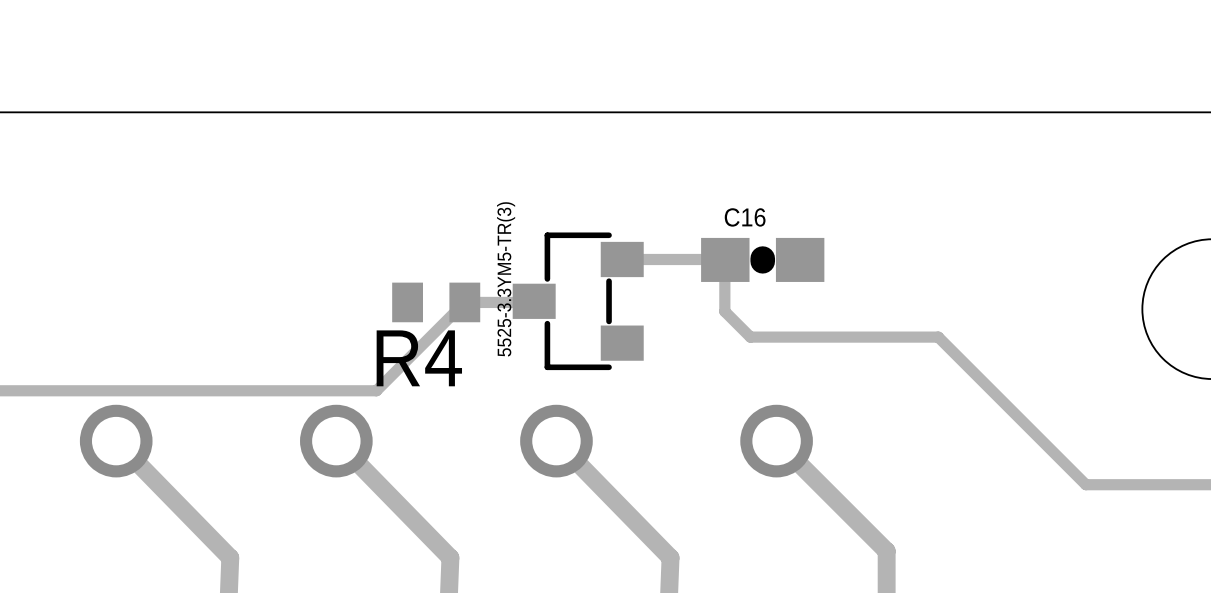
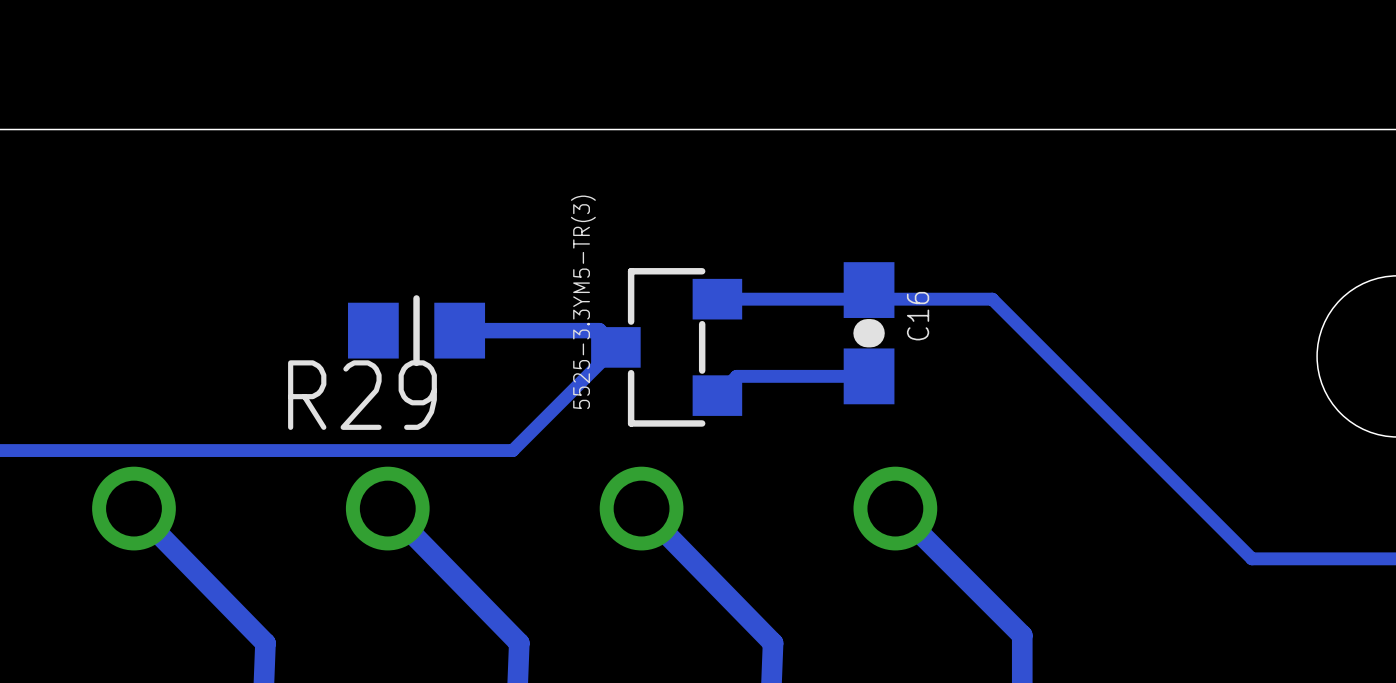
track: (724, 259) (724, 311) (750, 337) (938, 337) -> (835, 299) (859, 299) (869, 290) (869, 299) (992, 299) (1081, 388)
C16 rotation: 0° (762, 259) -> 90° clockwise (869, 333)
R29: none -> (416, 330)
track: none -> (459, 330) (599, 330) (615, 347)
R4: (436, 302) -> none
track: (533, 302) (464, 302) (376, 390) -> (614, 348) (512, 450) (434, 450)
track: none -> (869, 376) (736, 376) (717, 395)

